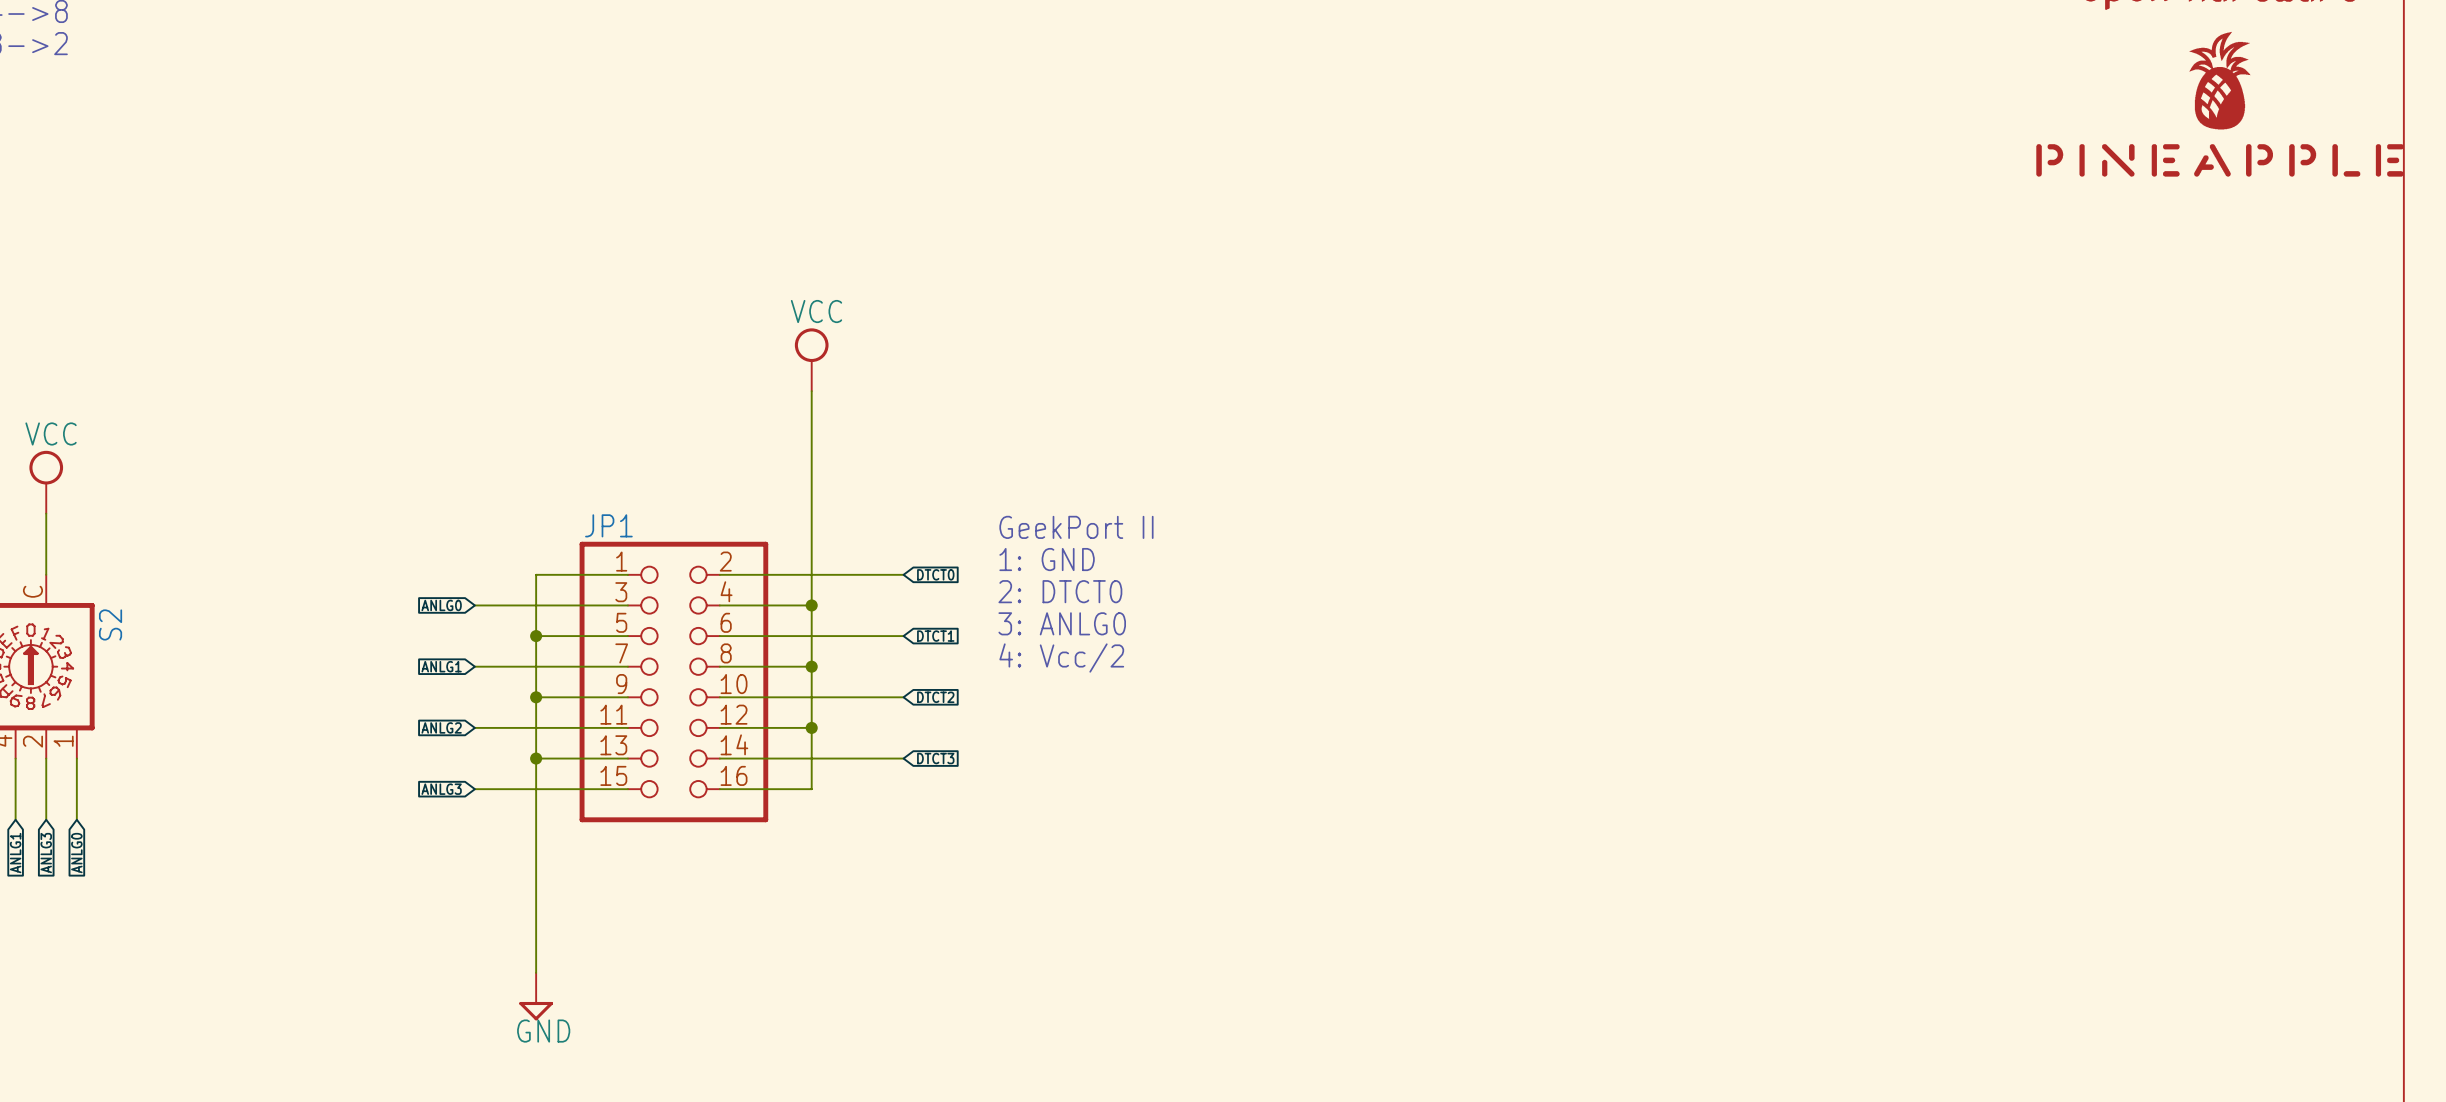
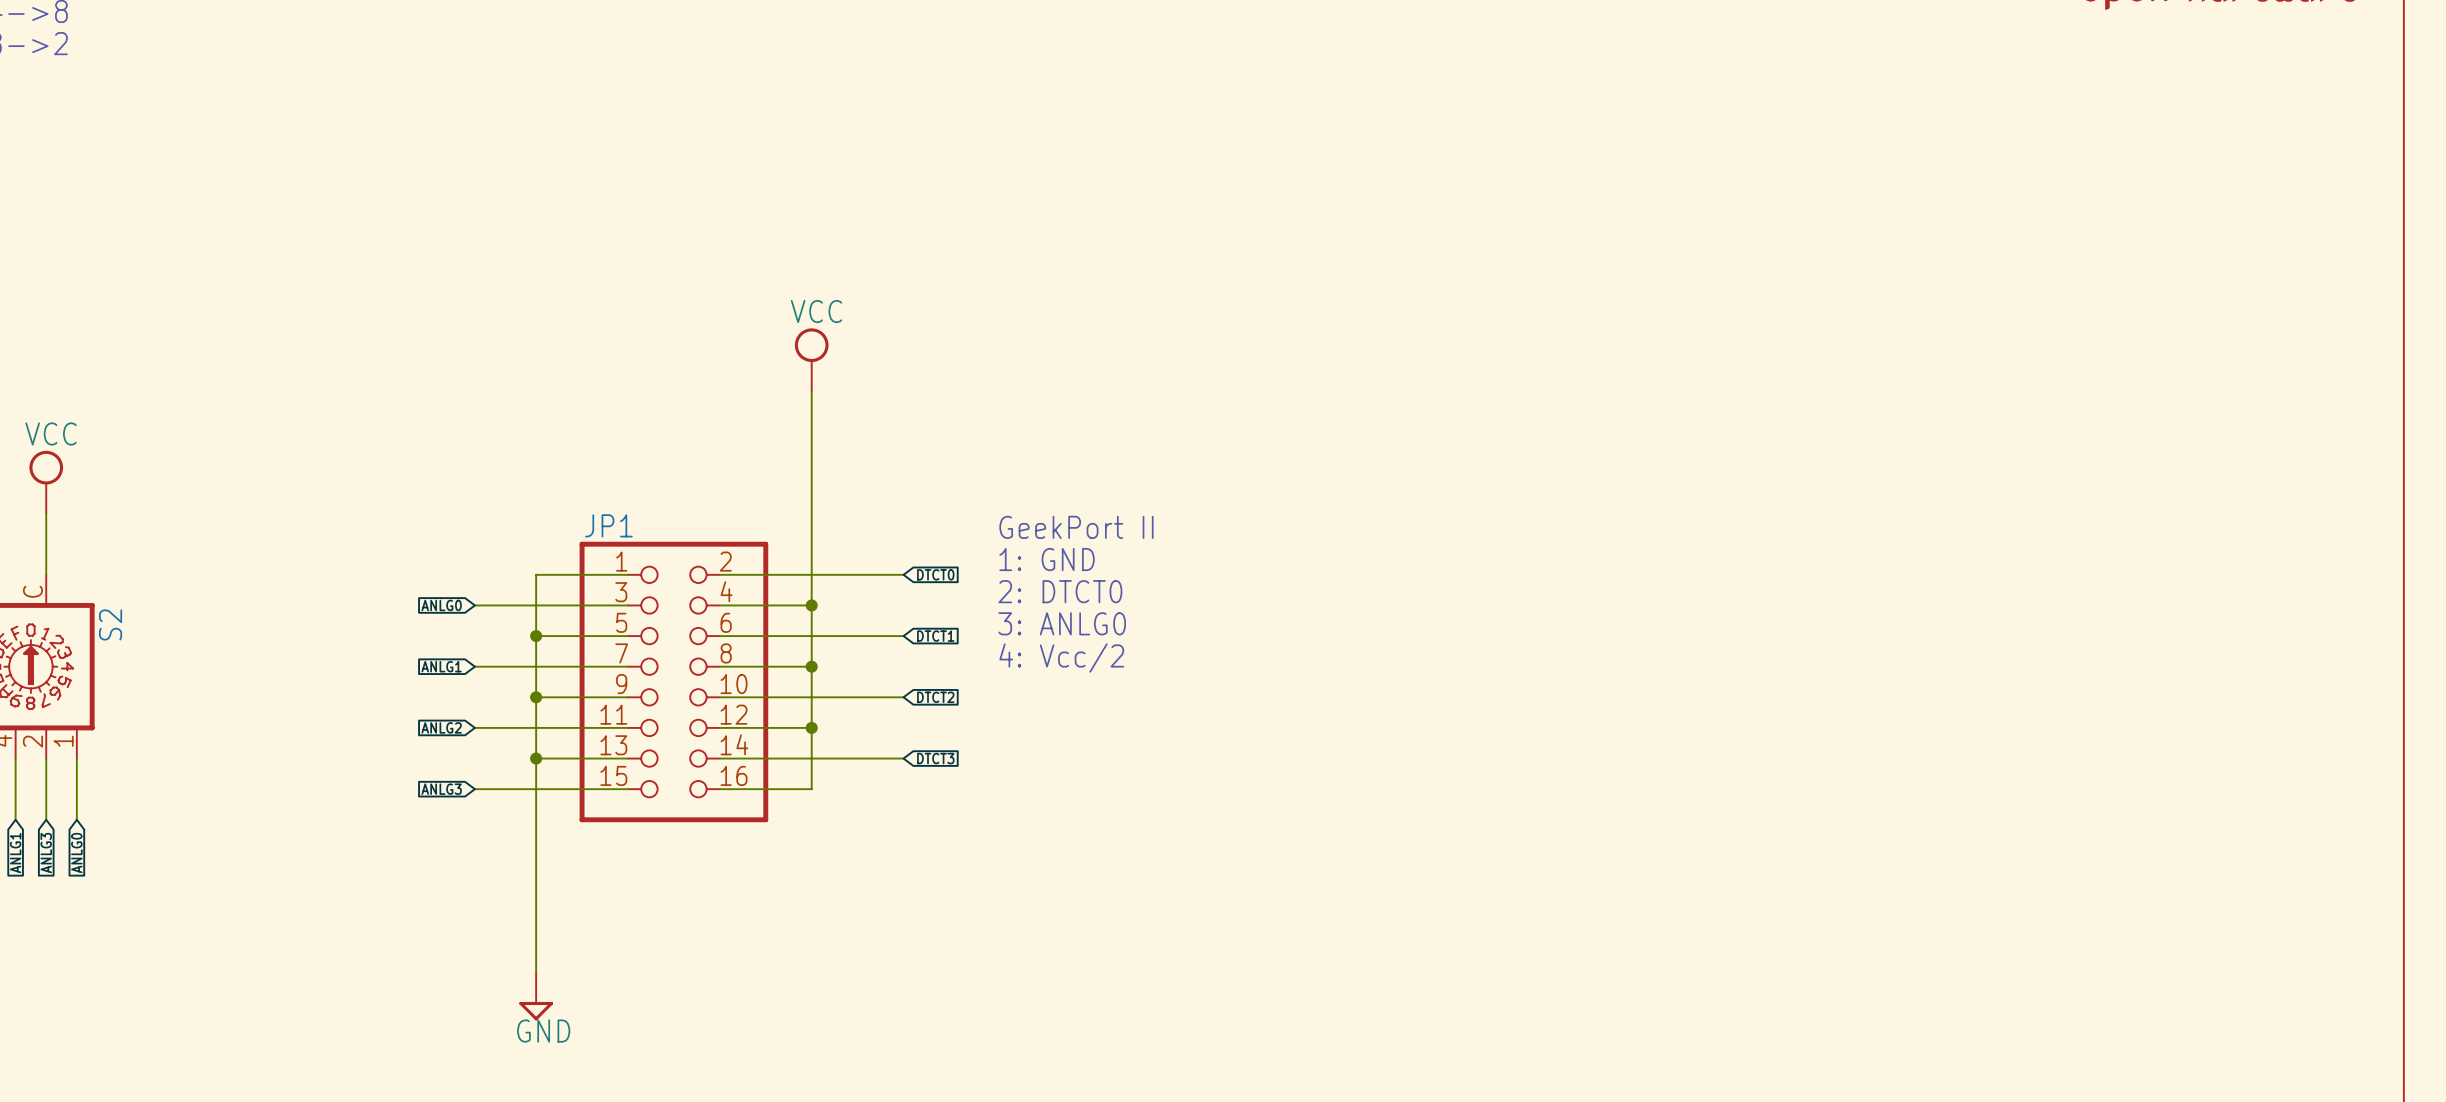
part: (2220, 104) -> none

